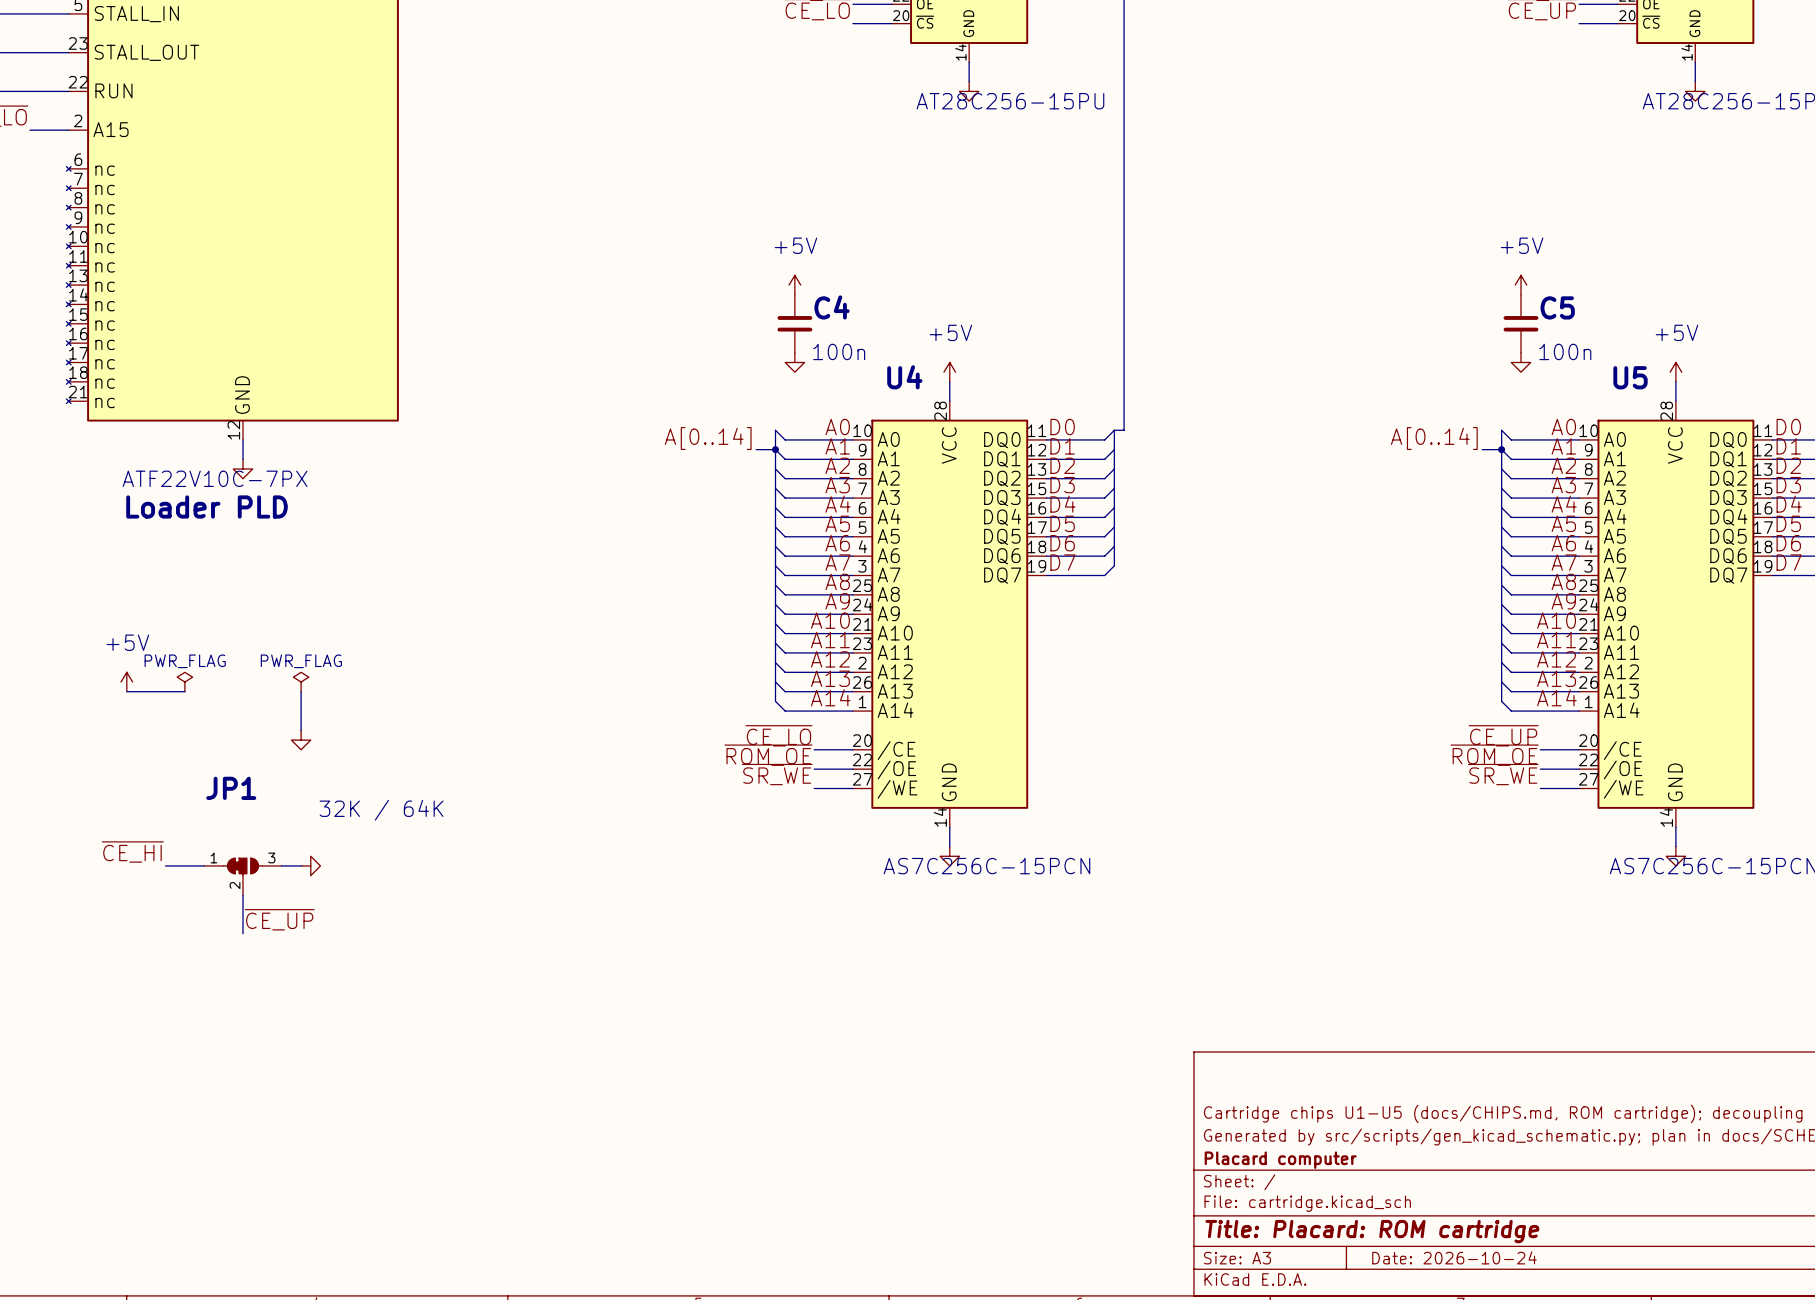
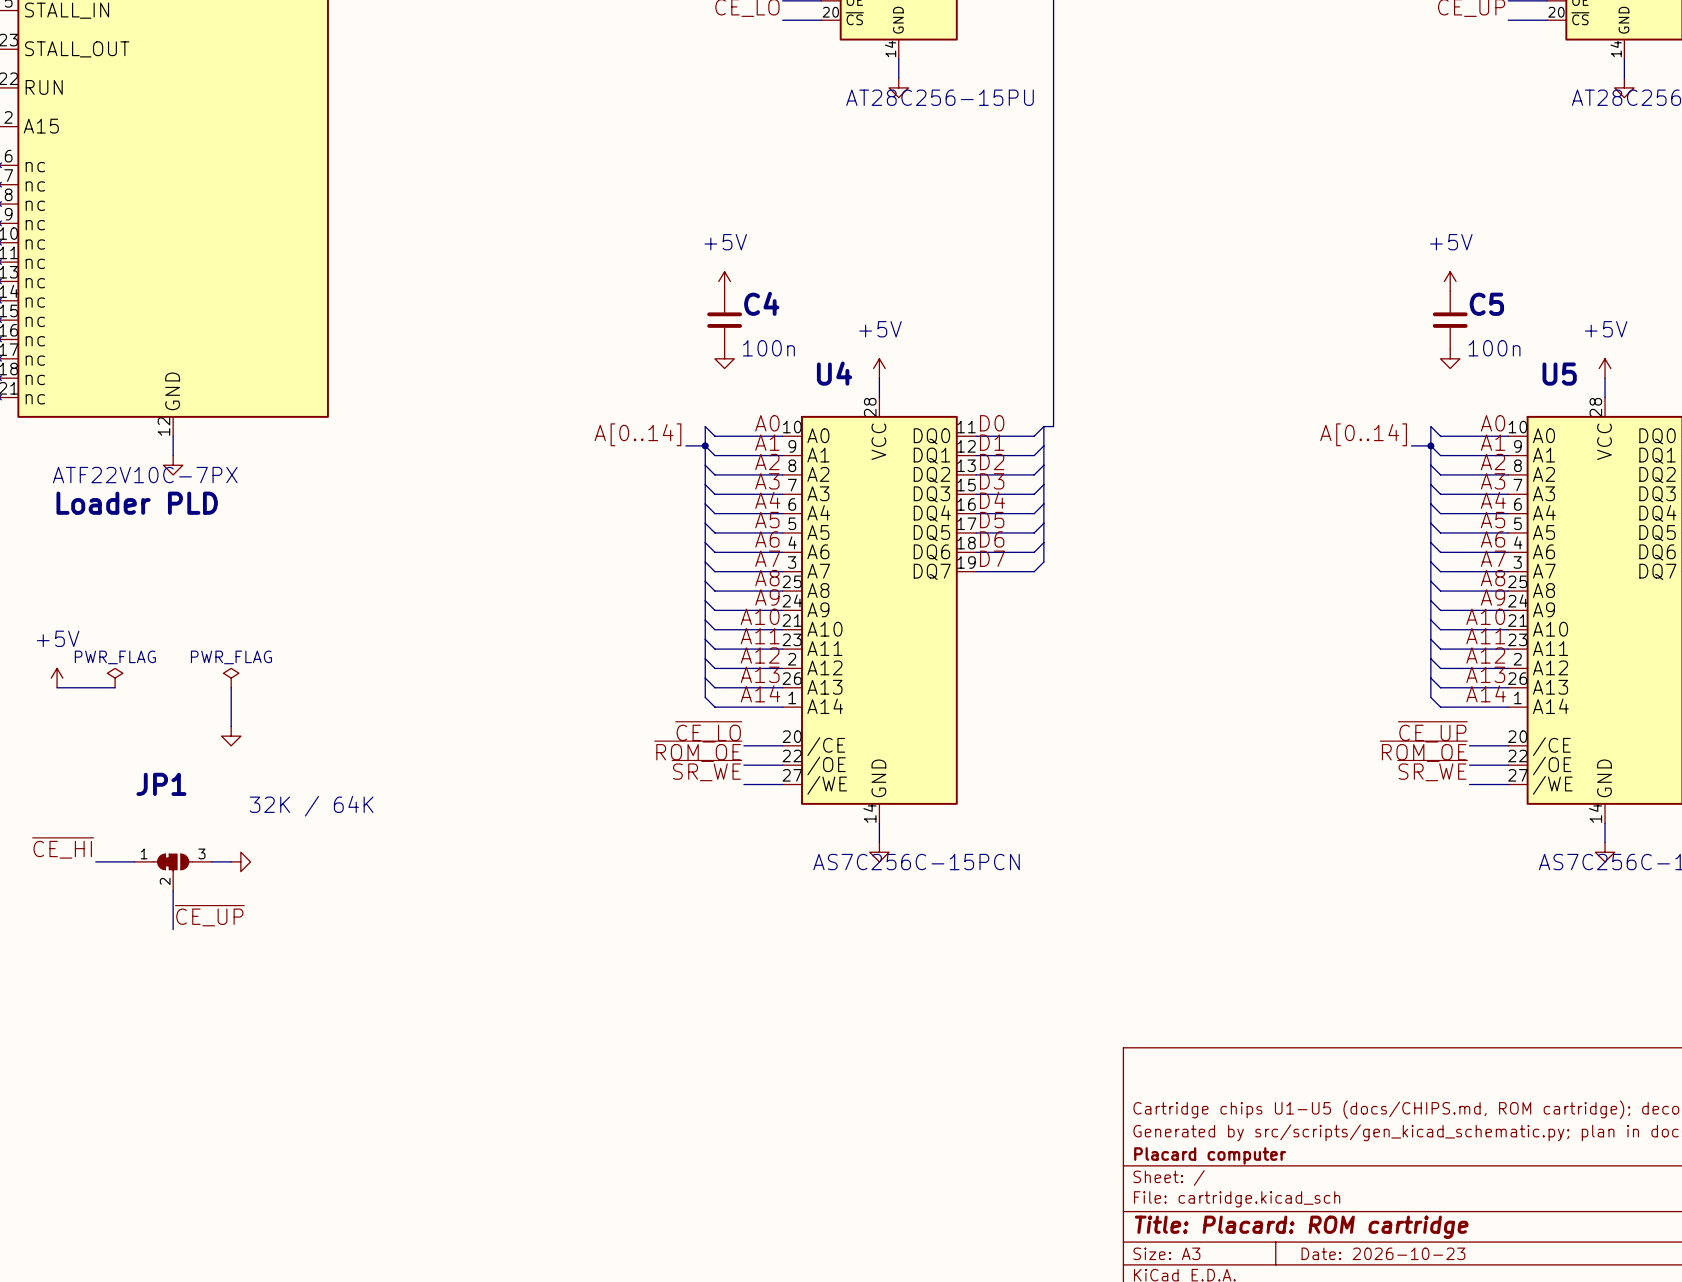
title block: Date: 2026-10-24 (1454, 1257) -> Date: 2026-10-23 (1383, 1253)

